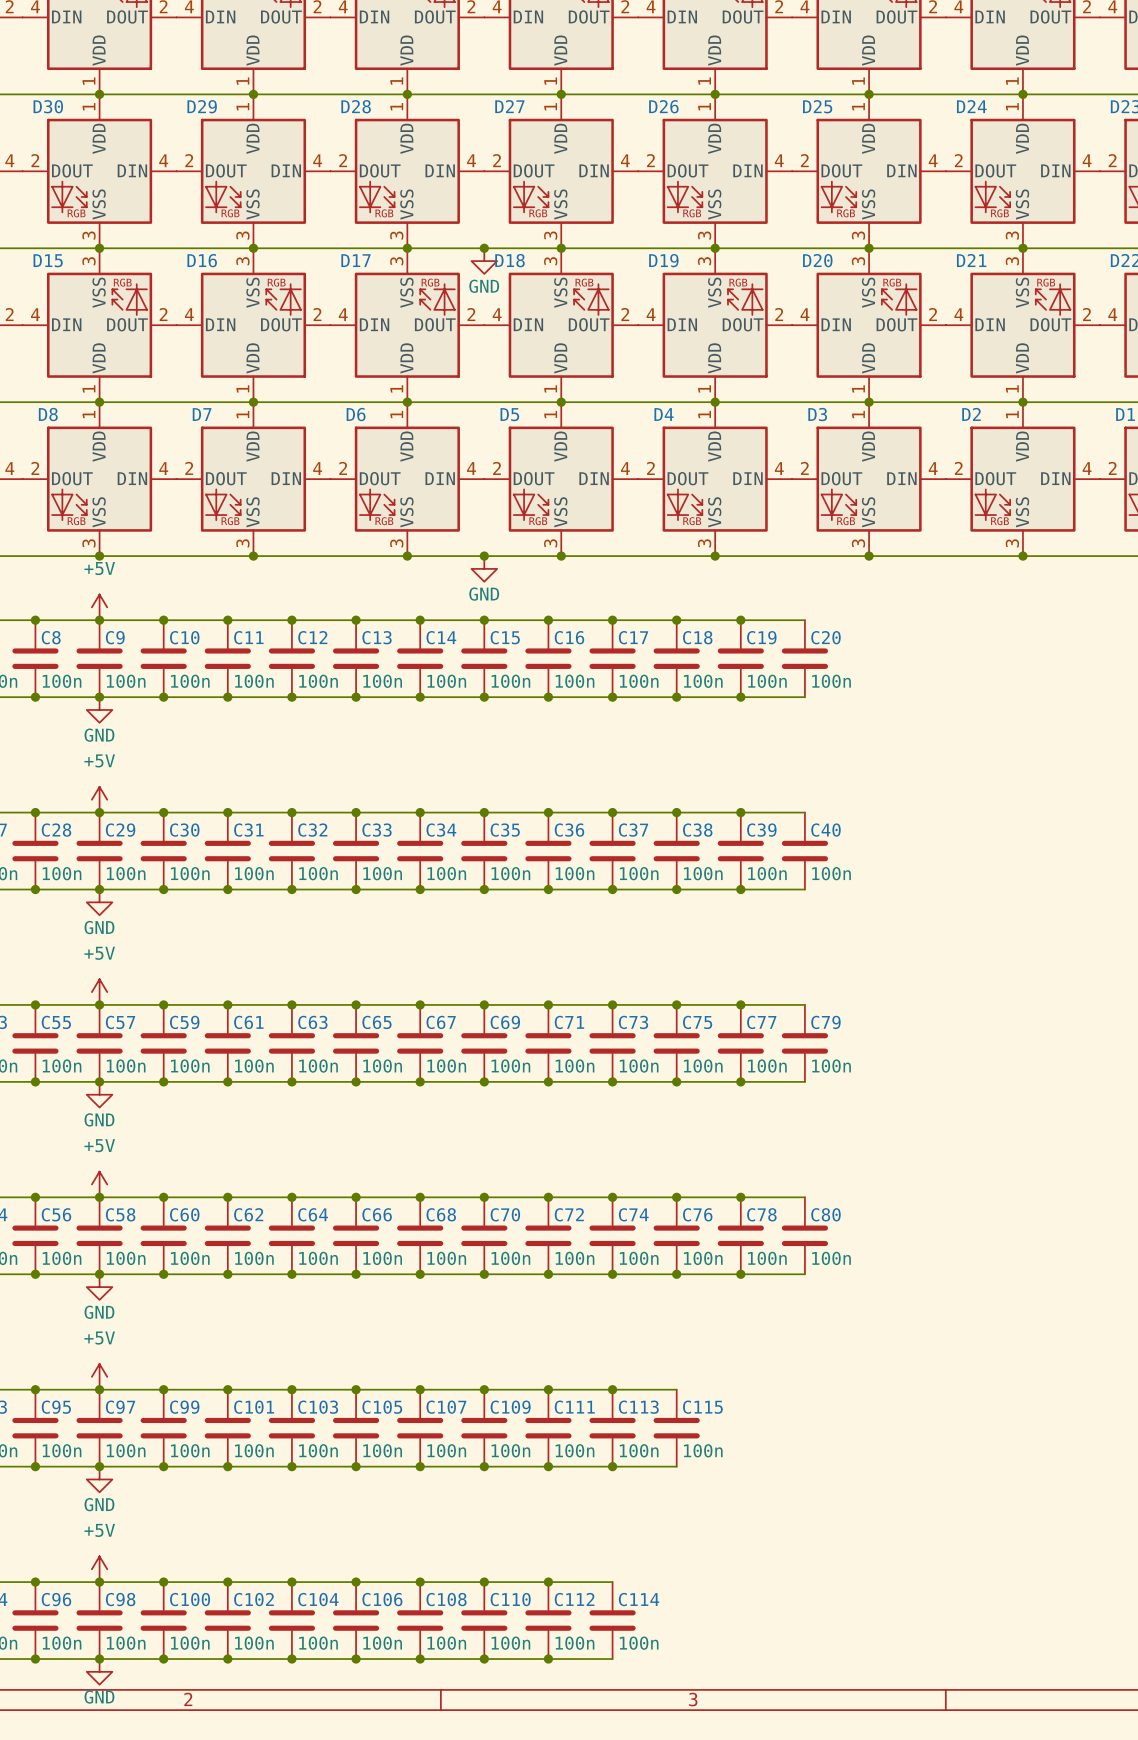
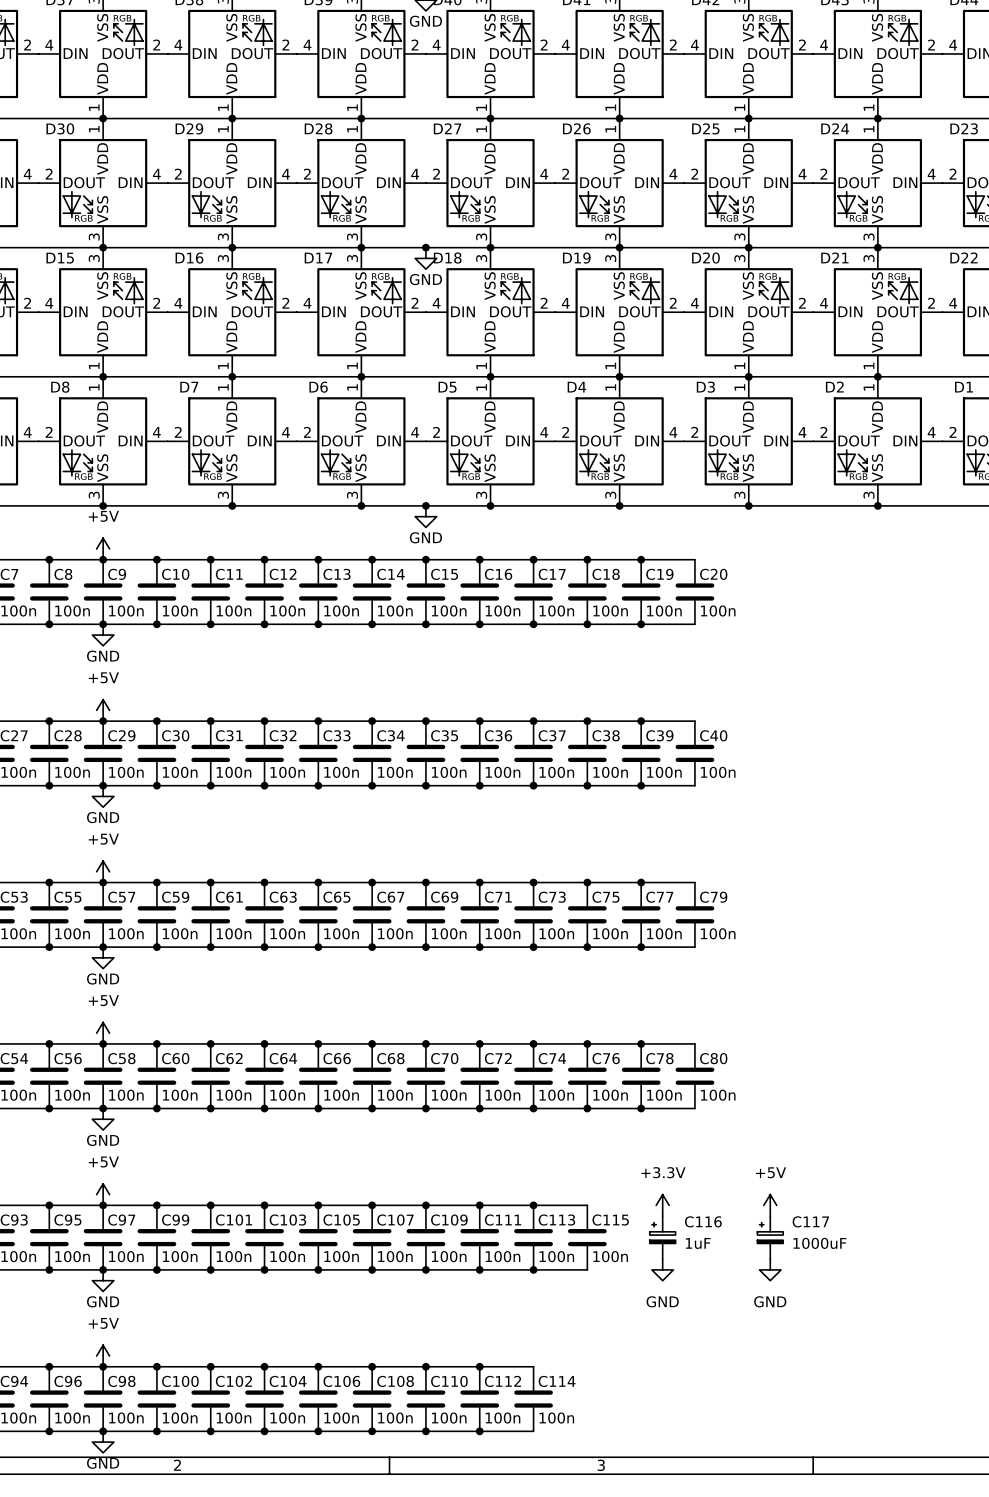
power symbol: none -> +3.3V (662, 1205)
power symbol: none -> +5V (770, 1205)
C116: none -> 1uF (662, 1237)
C117: none -> 1000uF (770, 1237)
power symbol: none -> GND (662, 1269)
power symbol: none -> GND (770, 1269)

